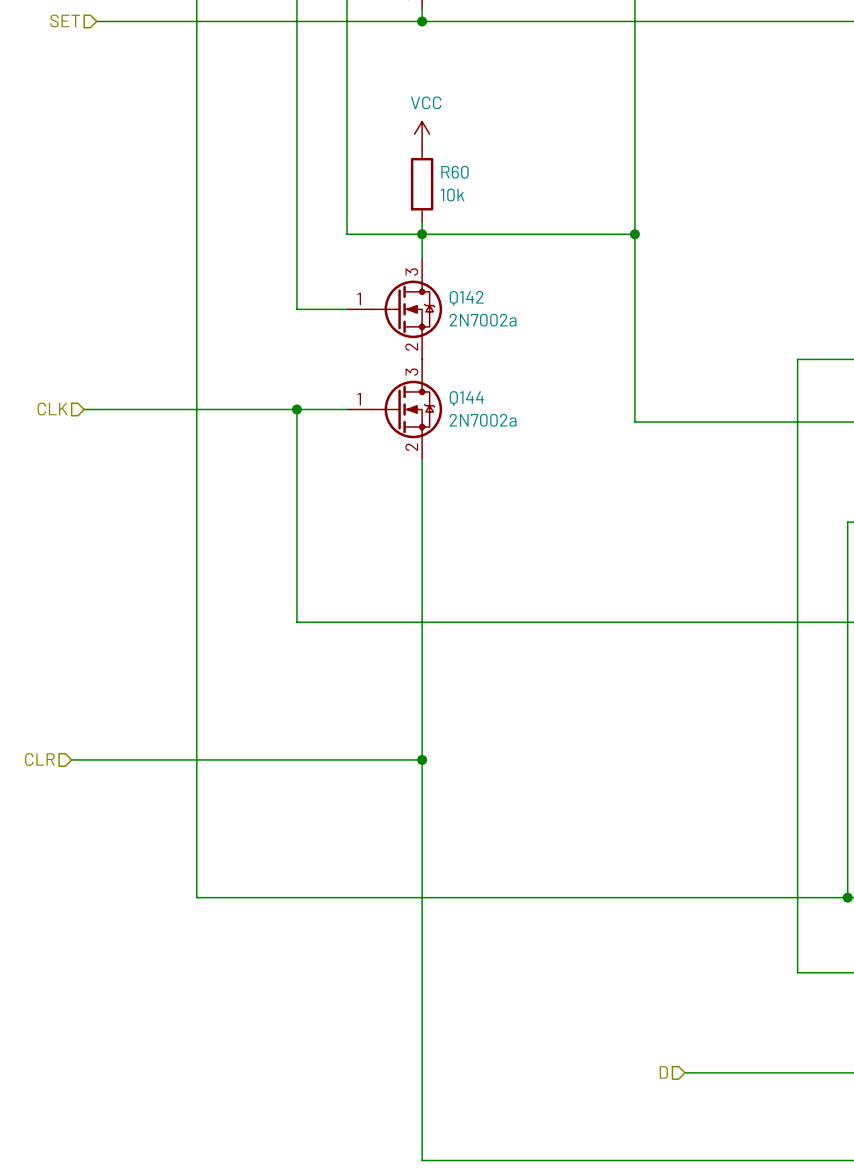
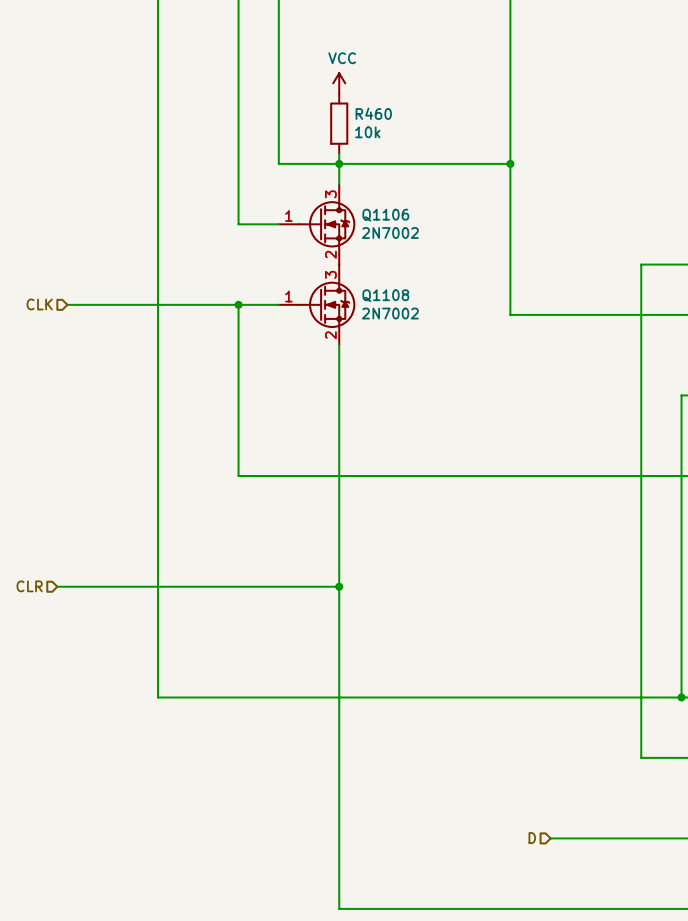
R60 name: R60 (454, 172) -> R460 (373, 113)
Q142 name: Q142 (466, 298) -> Q1106 (385, 215)
Q142 value: 2N7002a (483, 320) -> 2N7002 (390, 233)
Q144 name: Q144 (466, 398) -> Q1108 (385, 295)
Q144 value: 2N7002a (483, 420) -> 2N7002 (390, 313)

